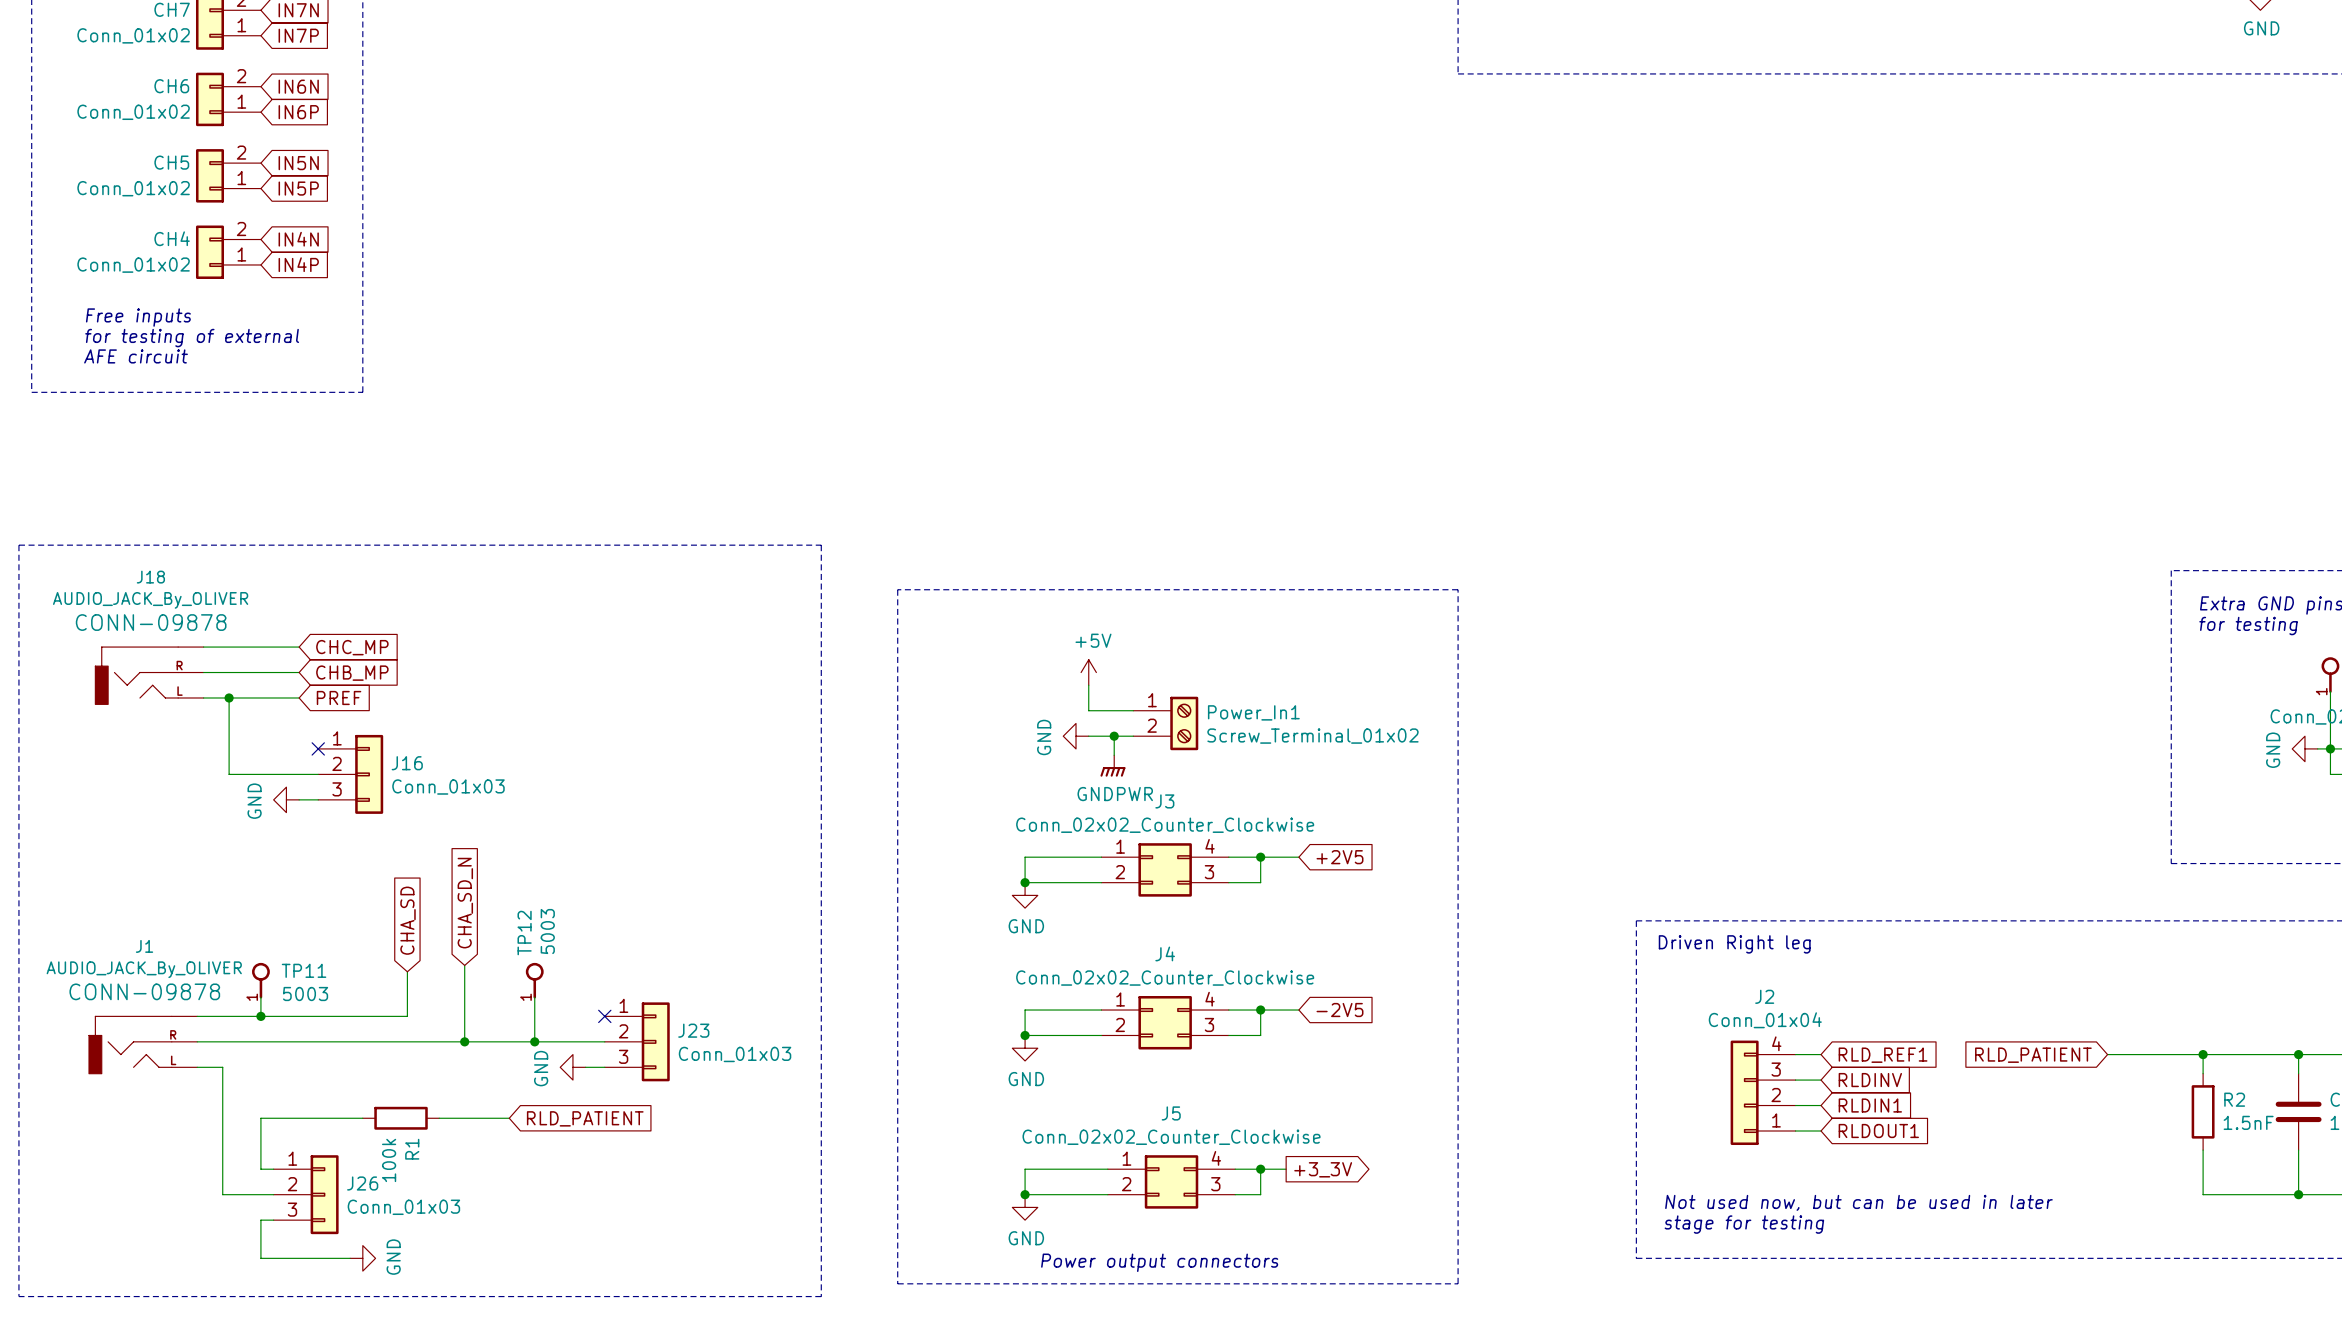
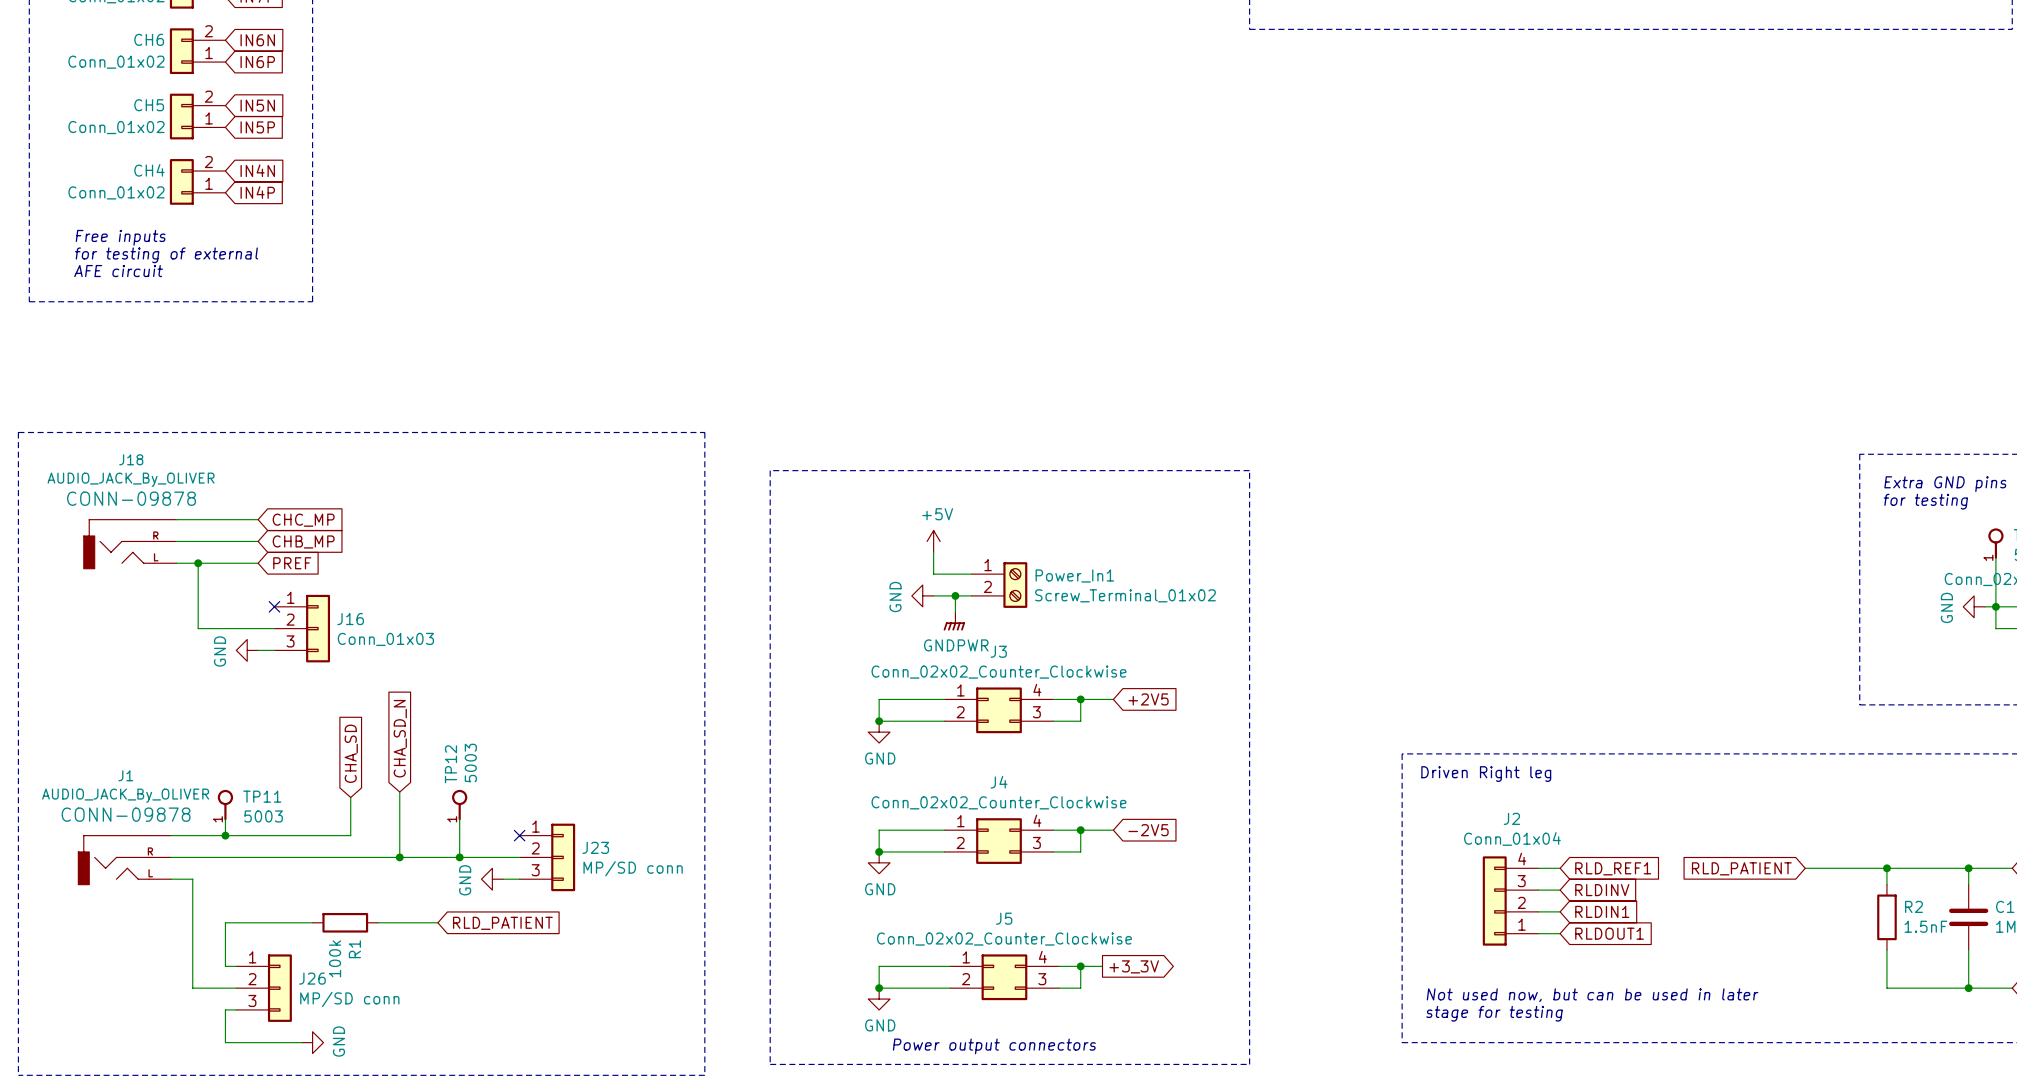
J23 value: Conn_01x03 (735, 1054) -> MP/SD conn (633, 868)
J26 value: Conn_01x03 (403, 1207) -> MP/SD conn (349, 999)

